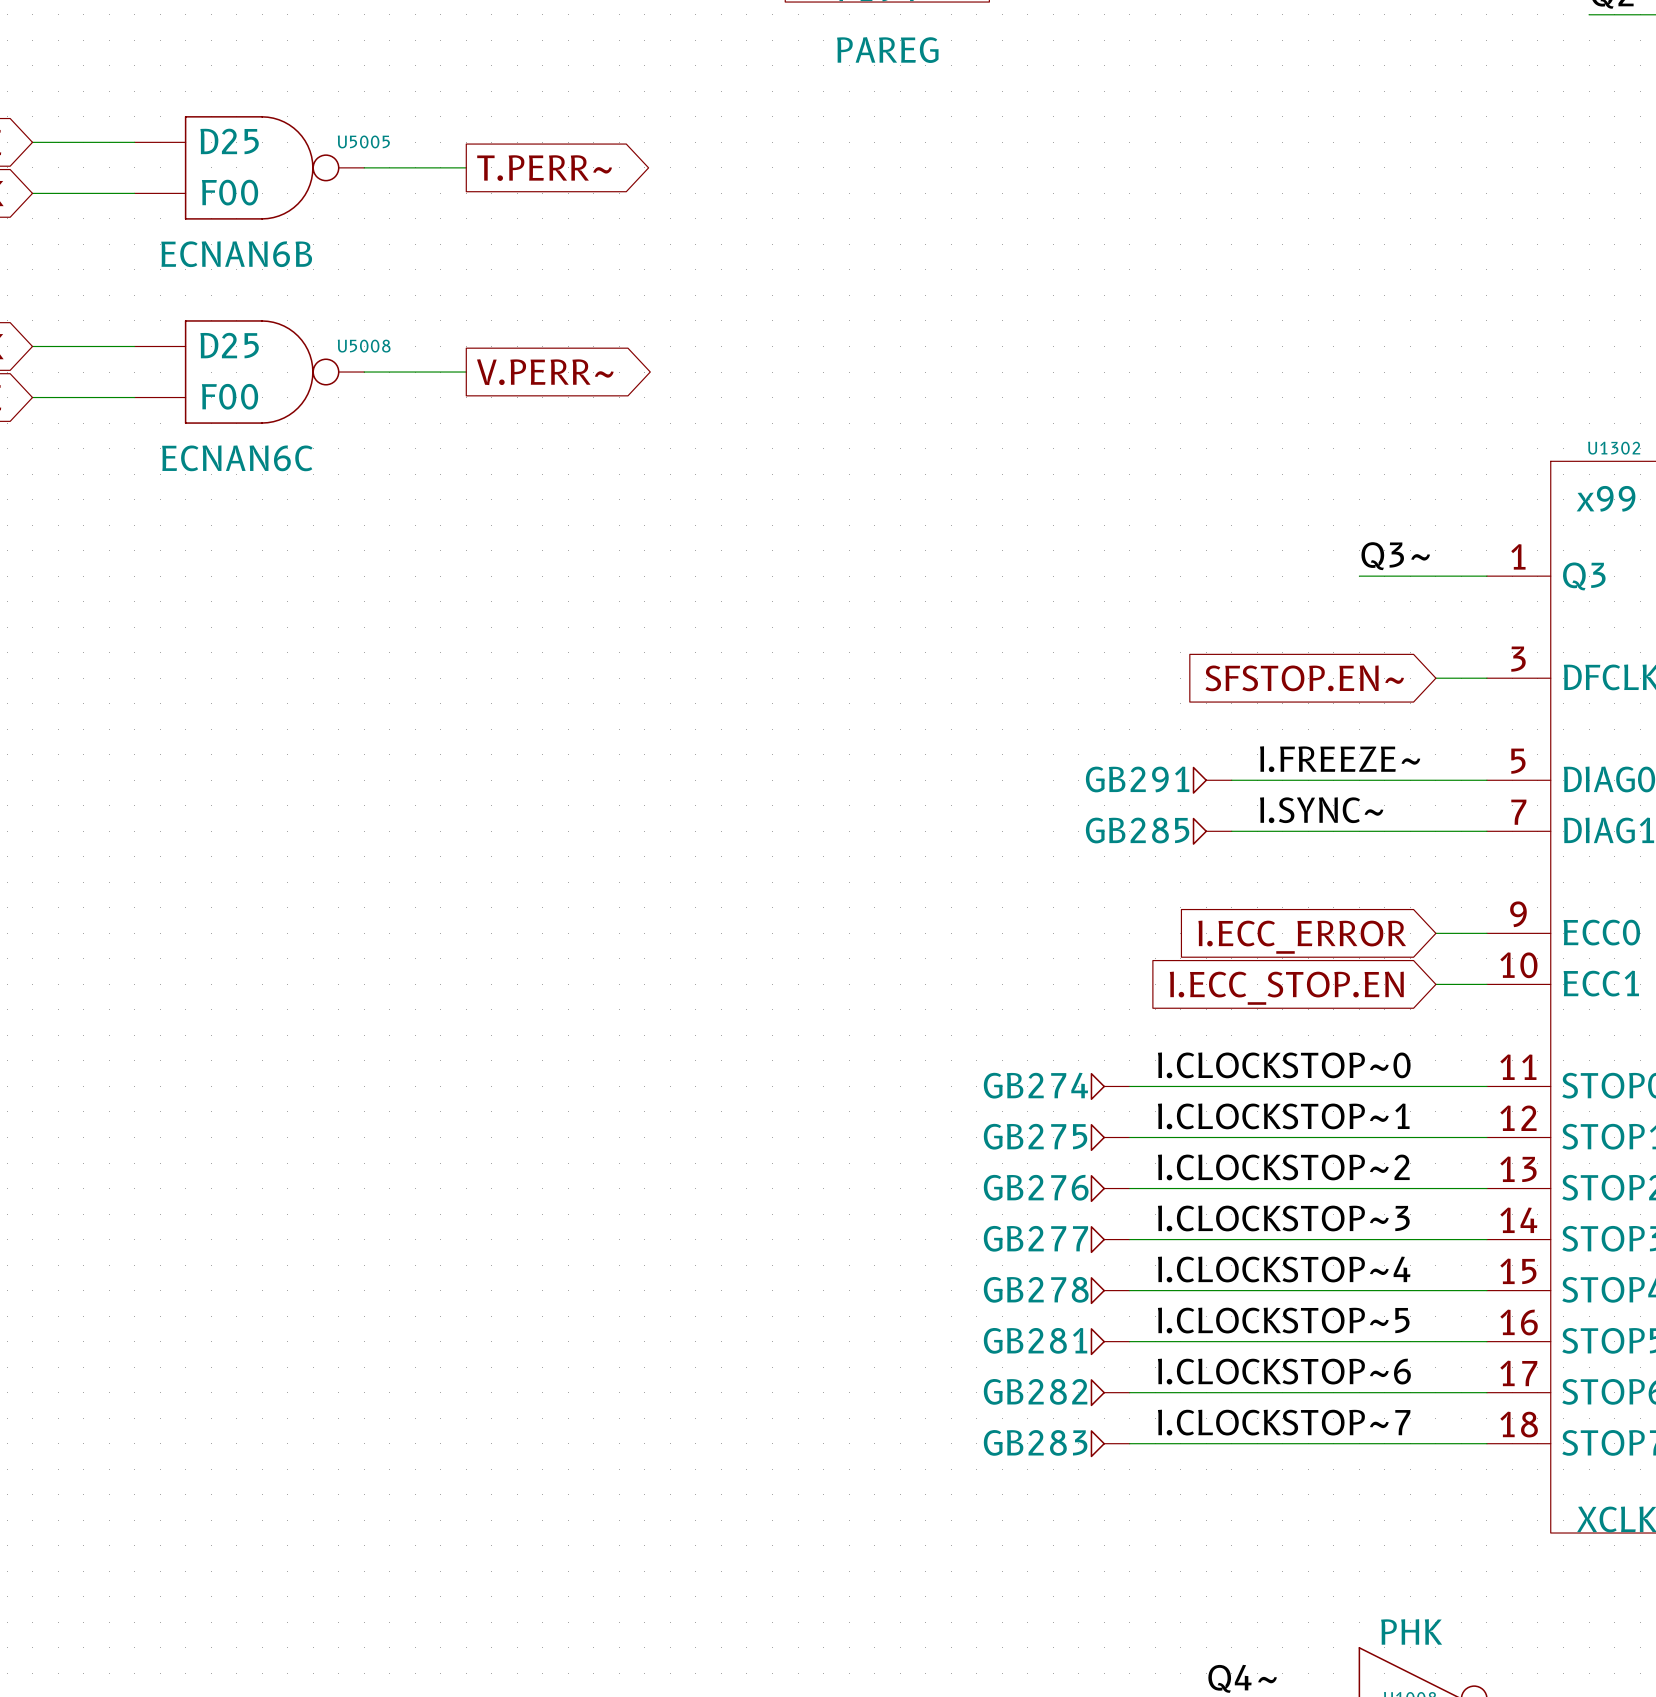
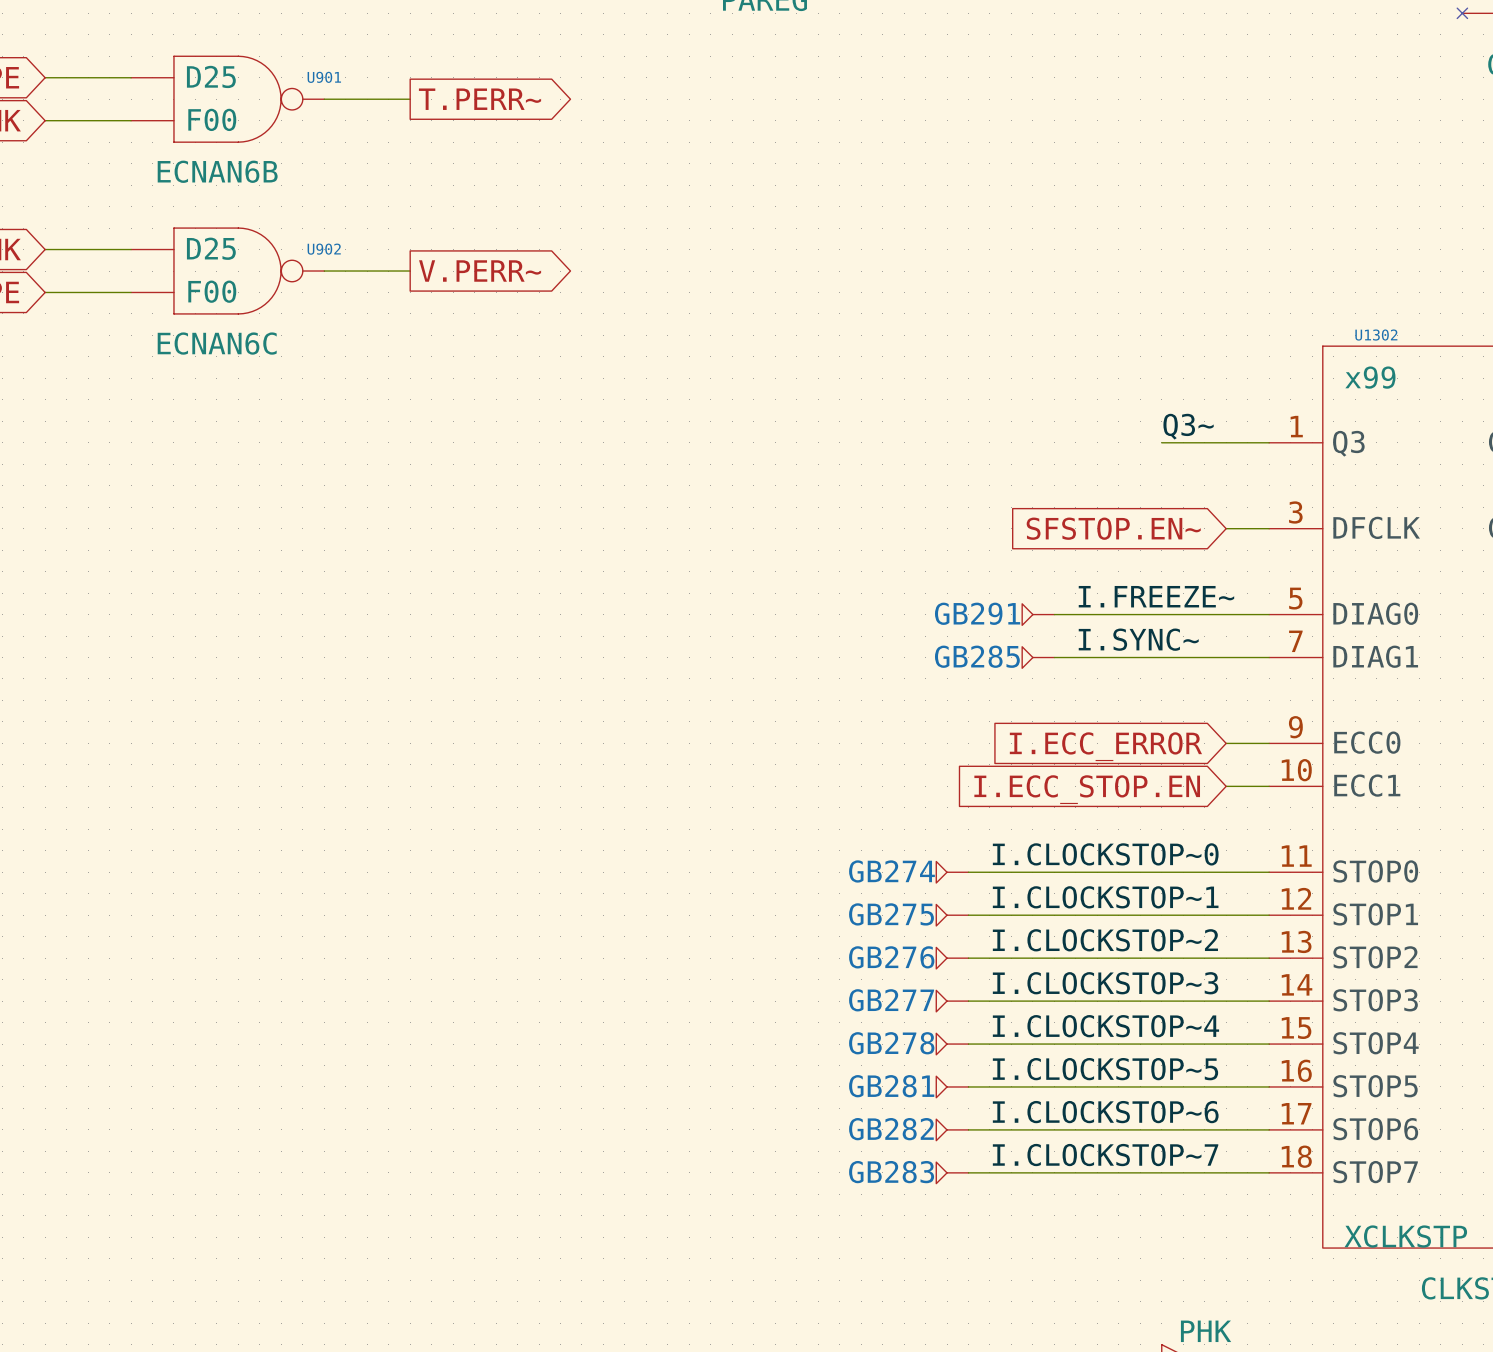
U5005 name: U5005 (363, 141) -> U901 (324, 77)
U5008 name: U5008 (364, 346) -> U902 (324, 249)

